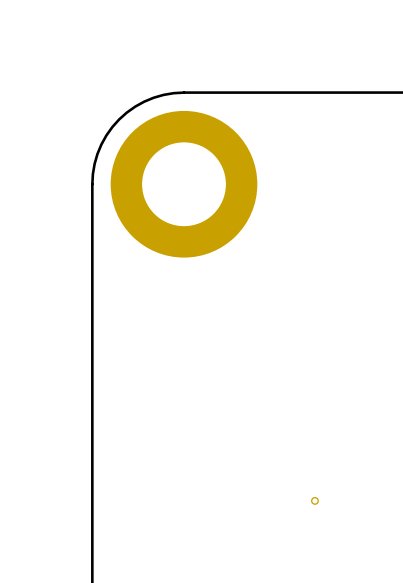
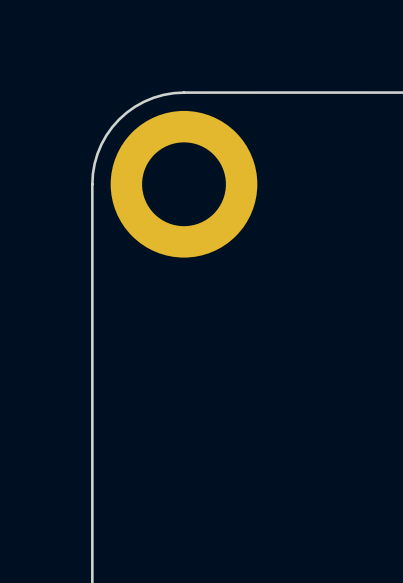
part: (314, 500) -> none

